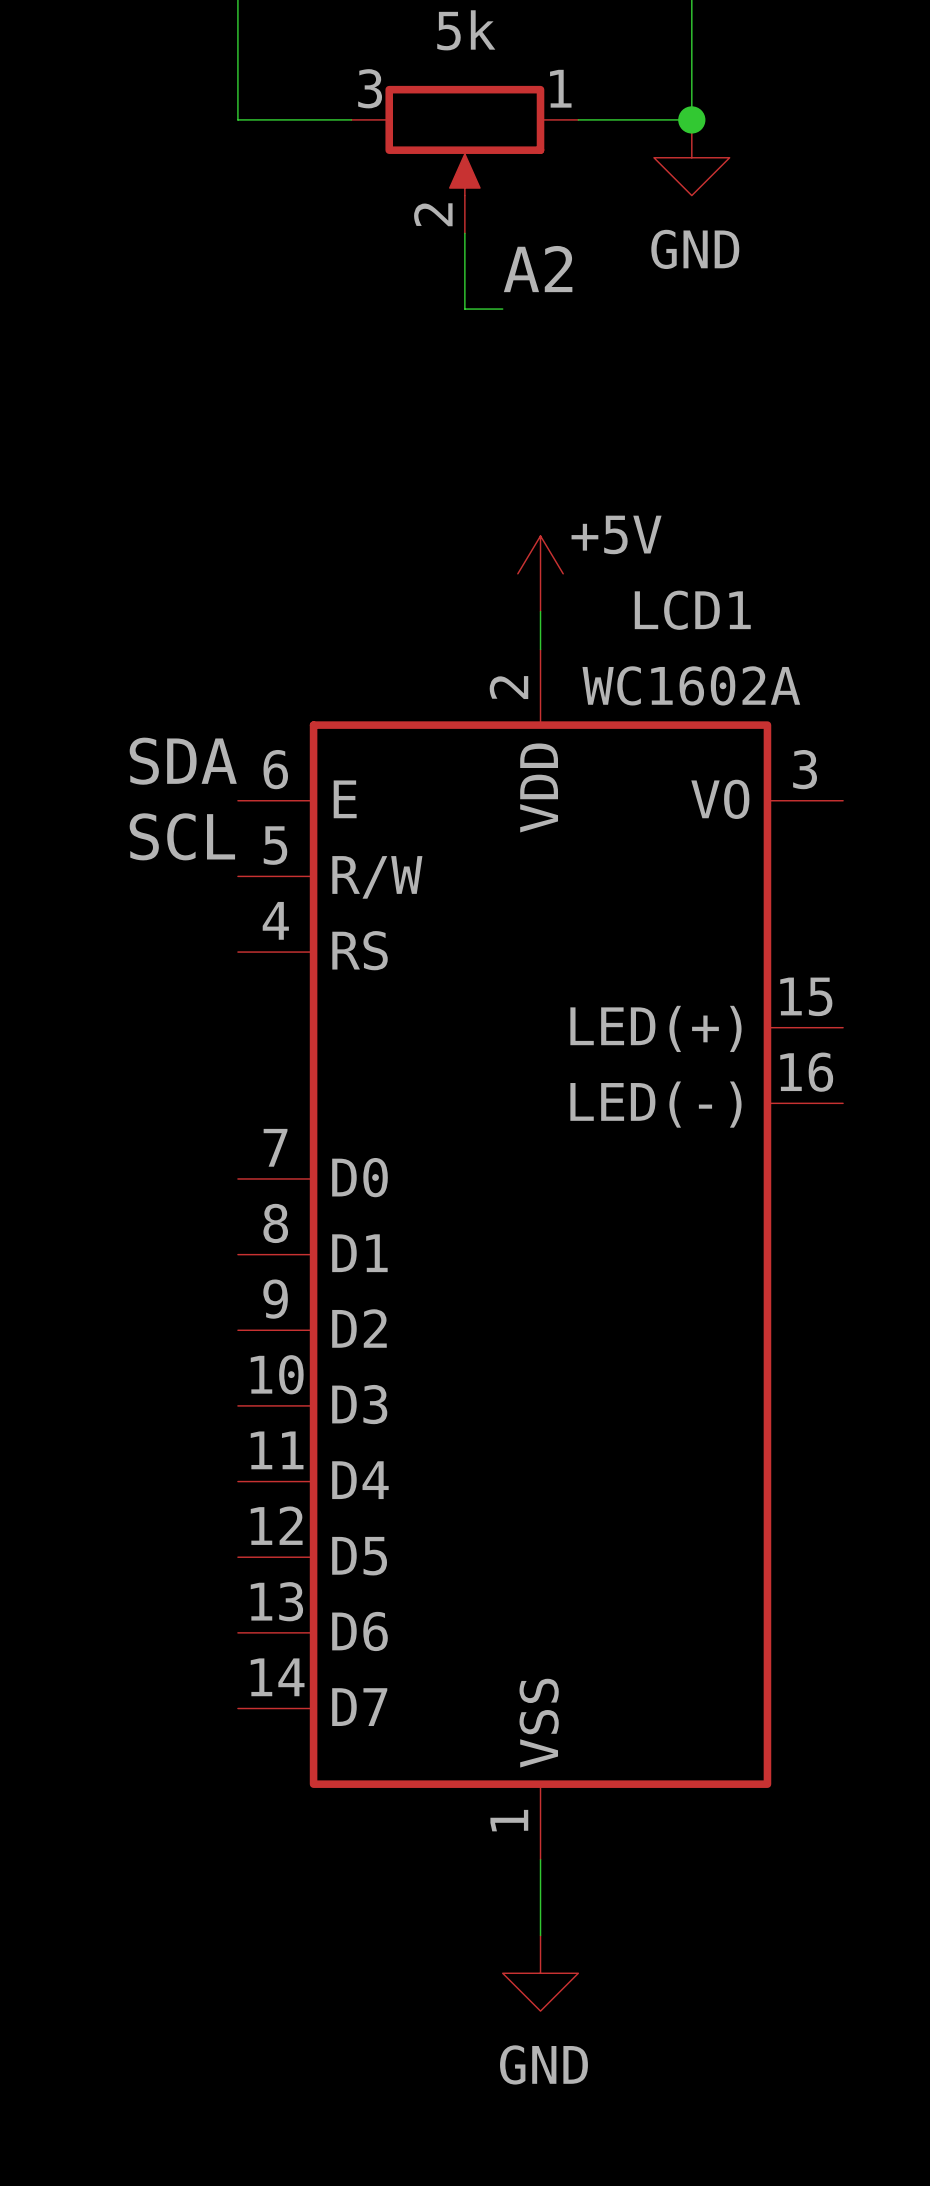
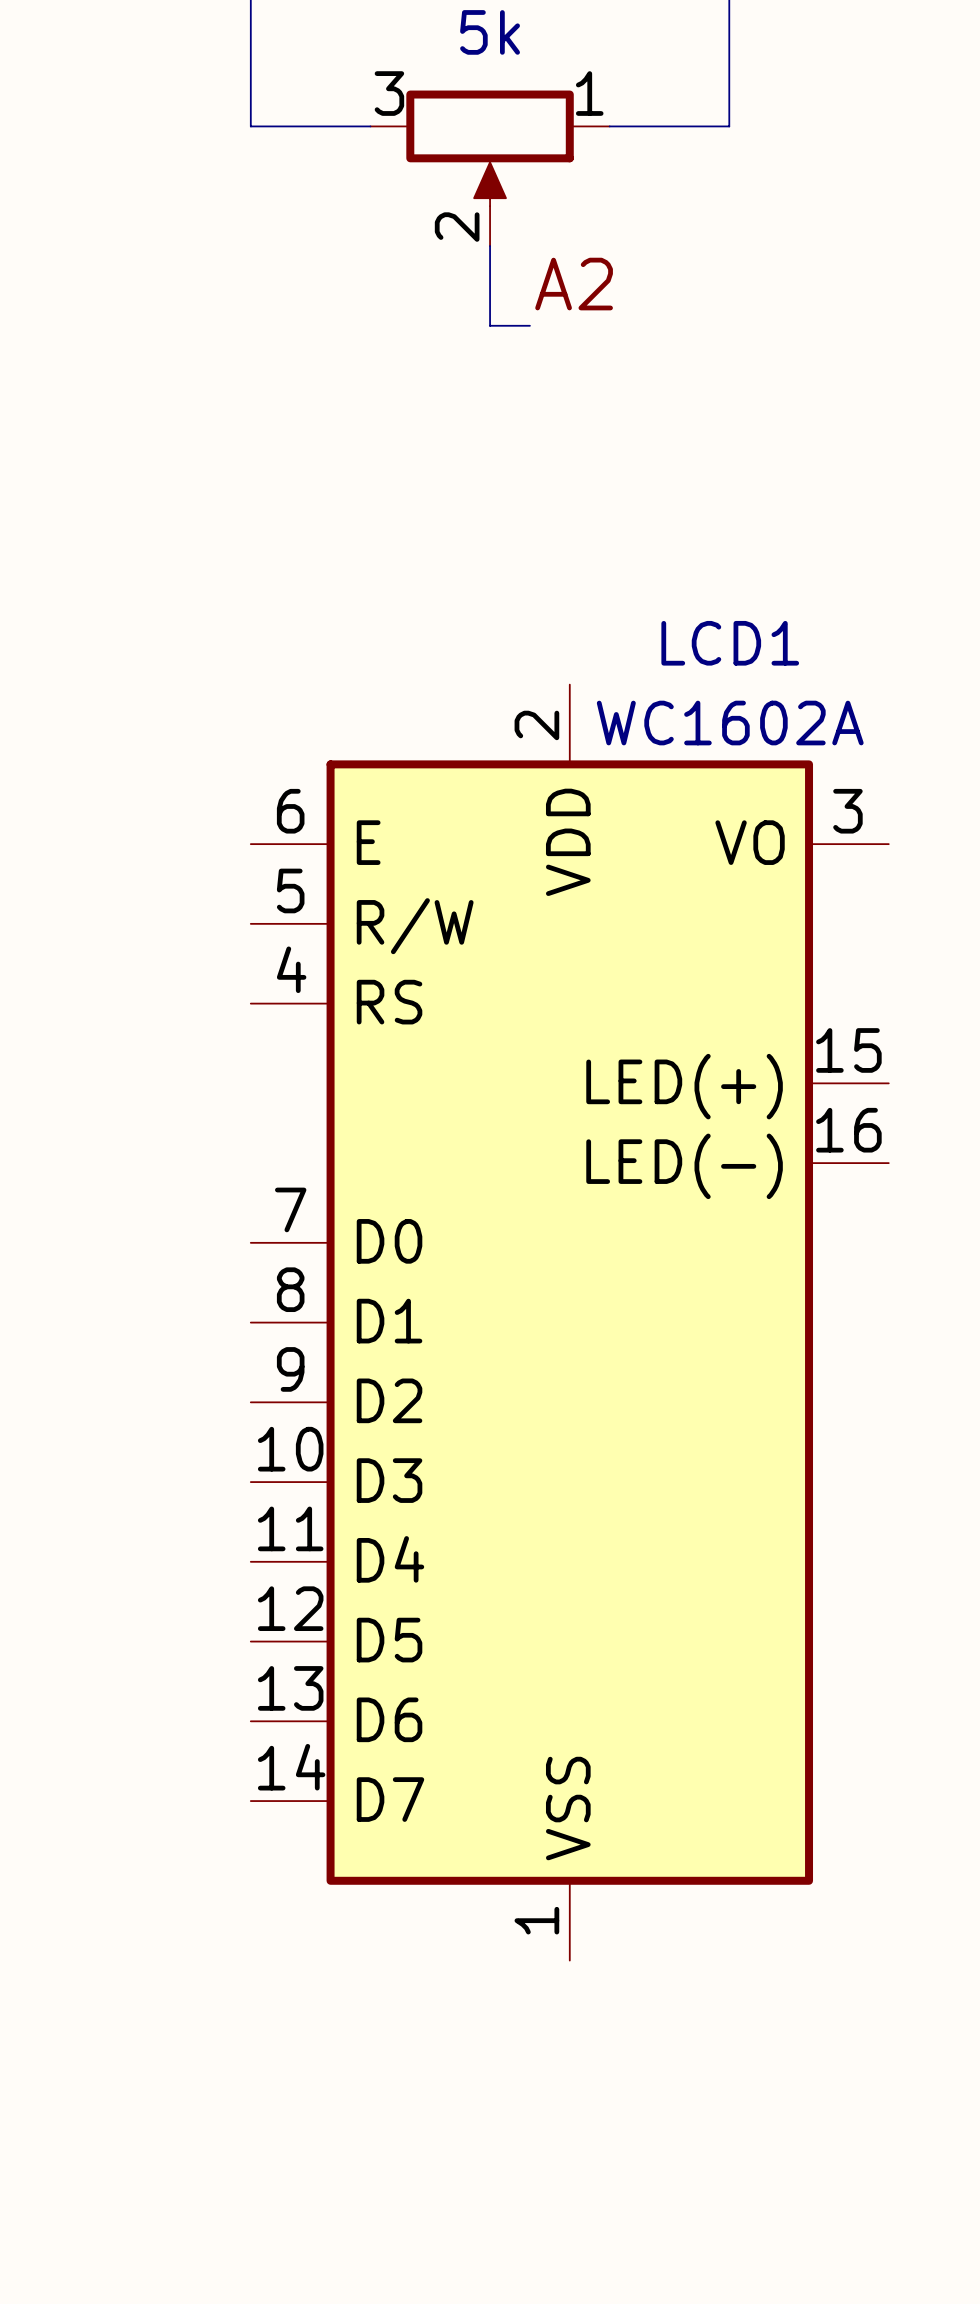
junction: (691, 119) -> none
power symbol: GND (691, 157) -> none
power symbol: +5V (540, 573) -> none
wire: (540, 611) (540, 649) -> none
label: SDA (183, 761) -> none
label: SCL (182, 836) -> none
wire: (540, 1859) (540, 1935) -> none
power symbol: GND (540, 1973) -> none

